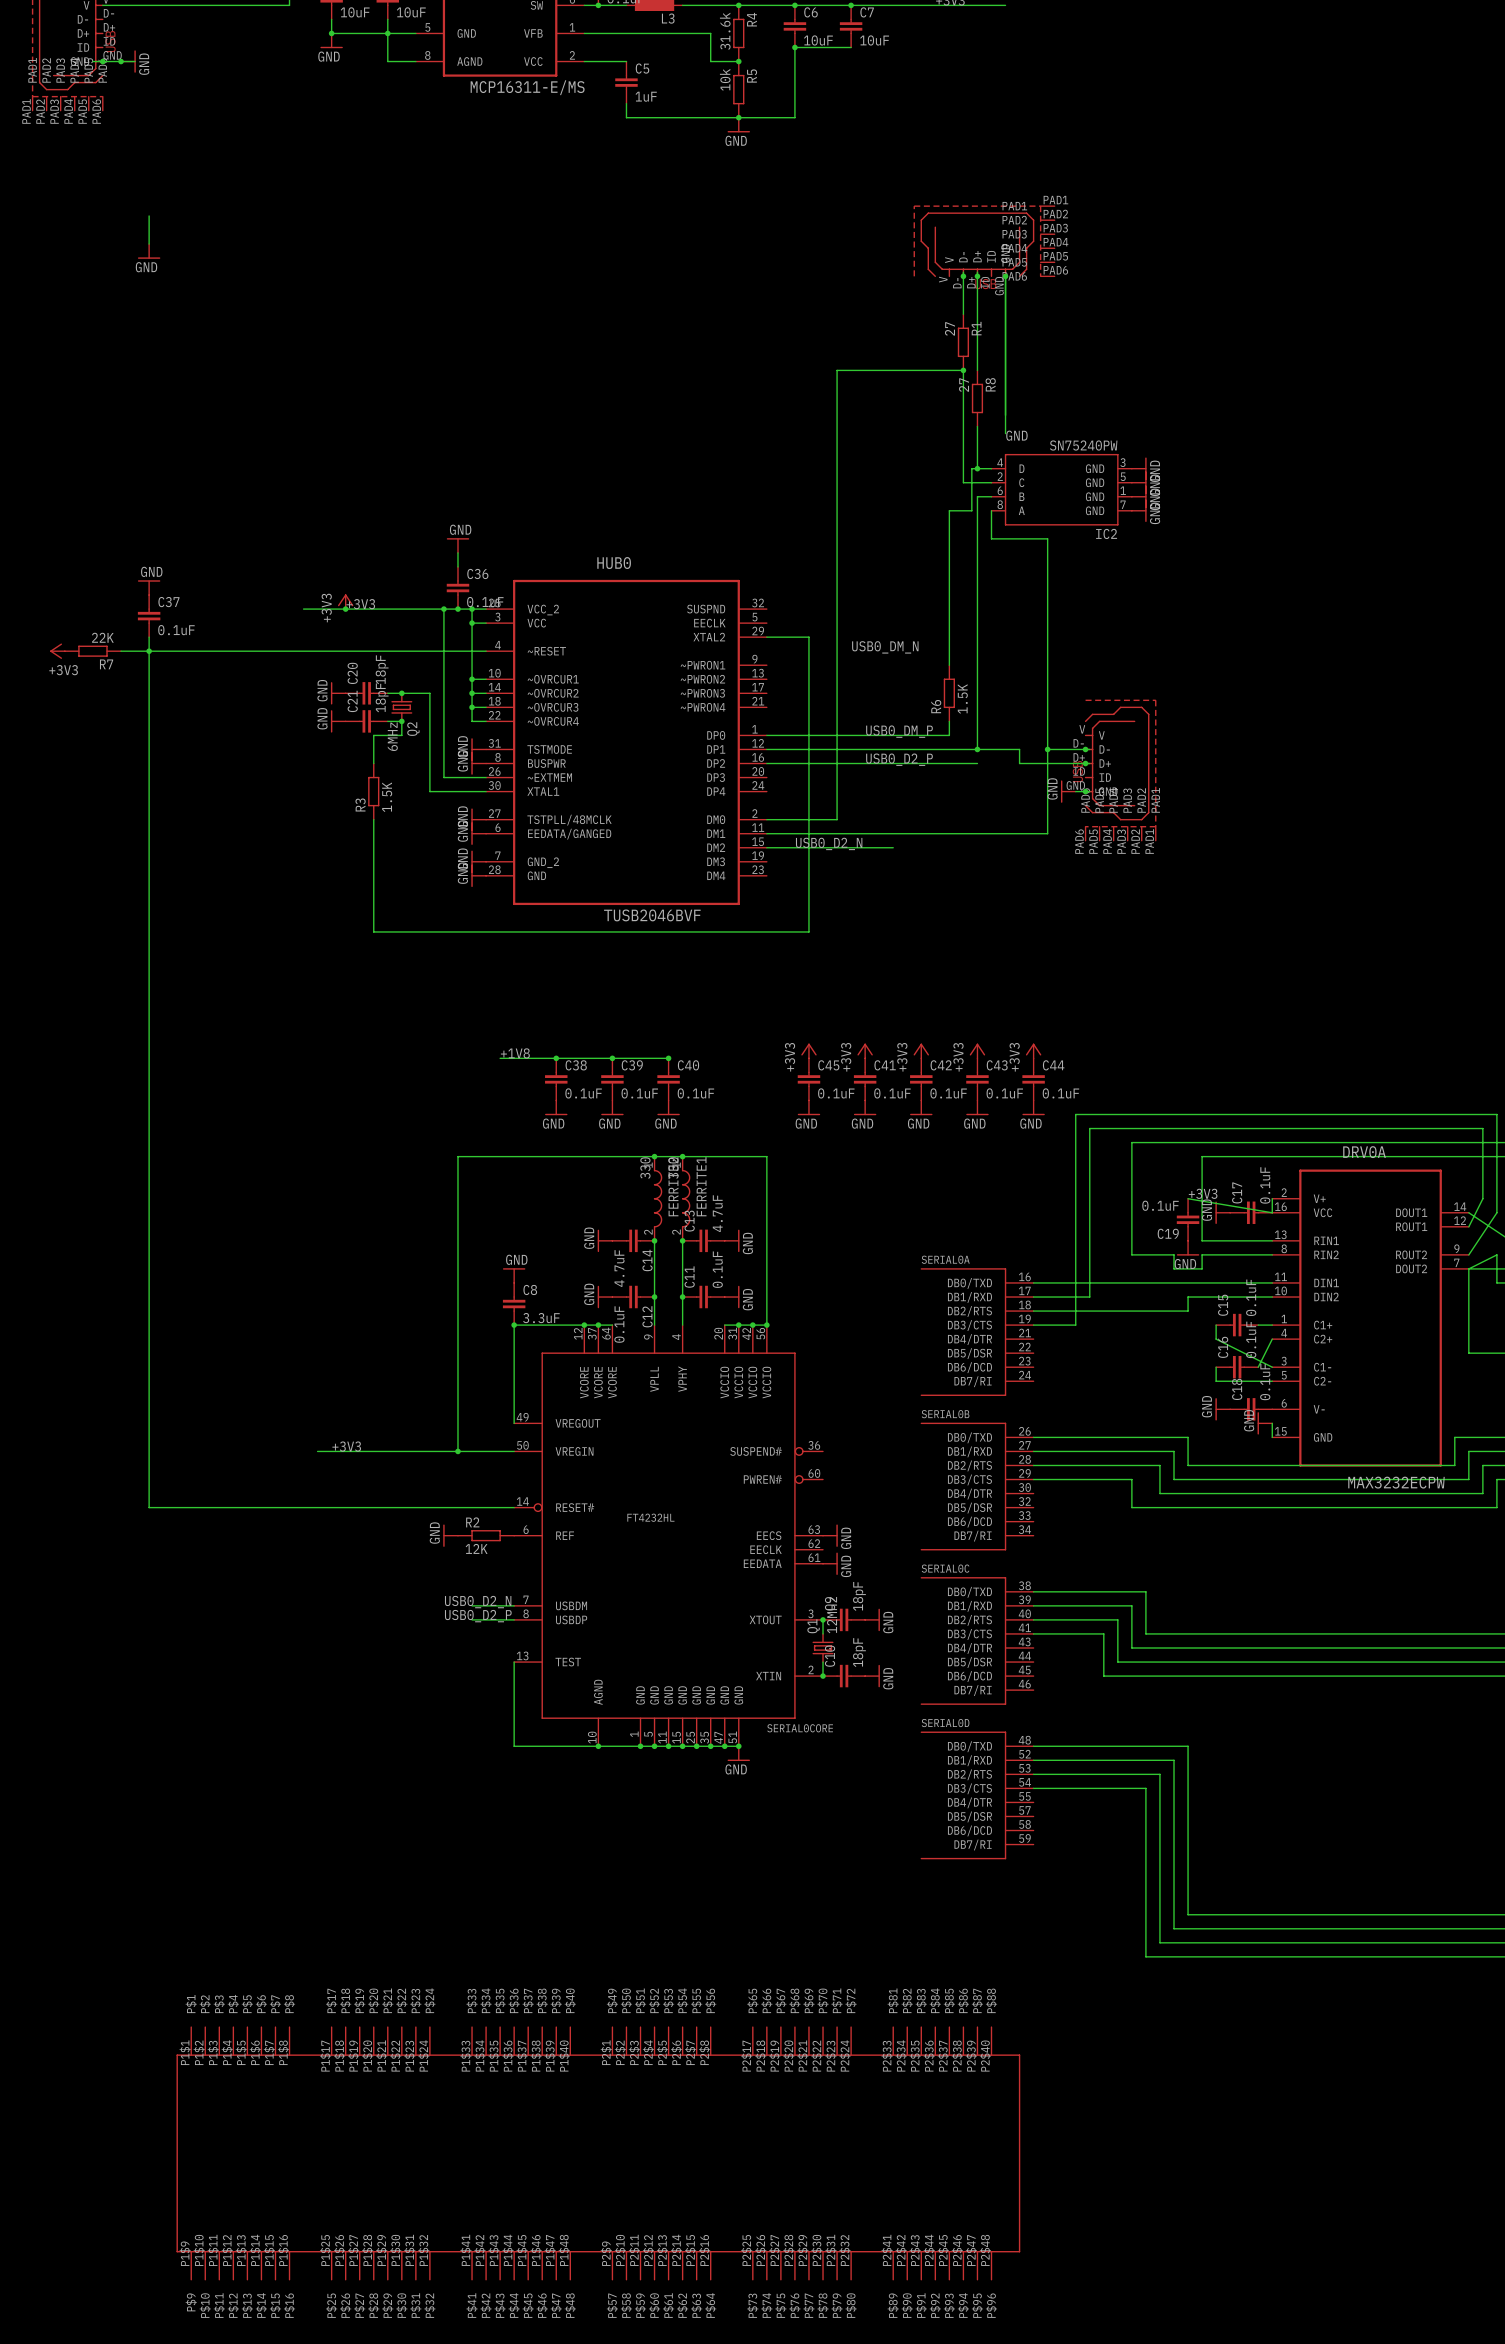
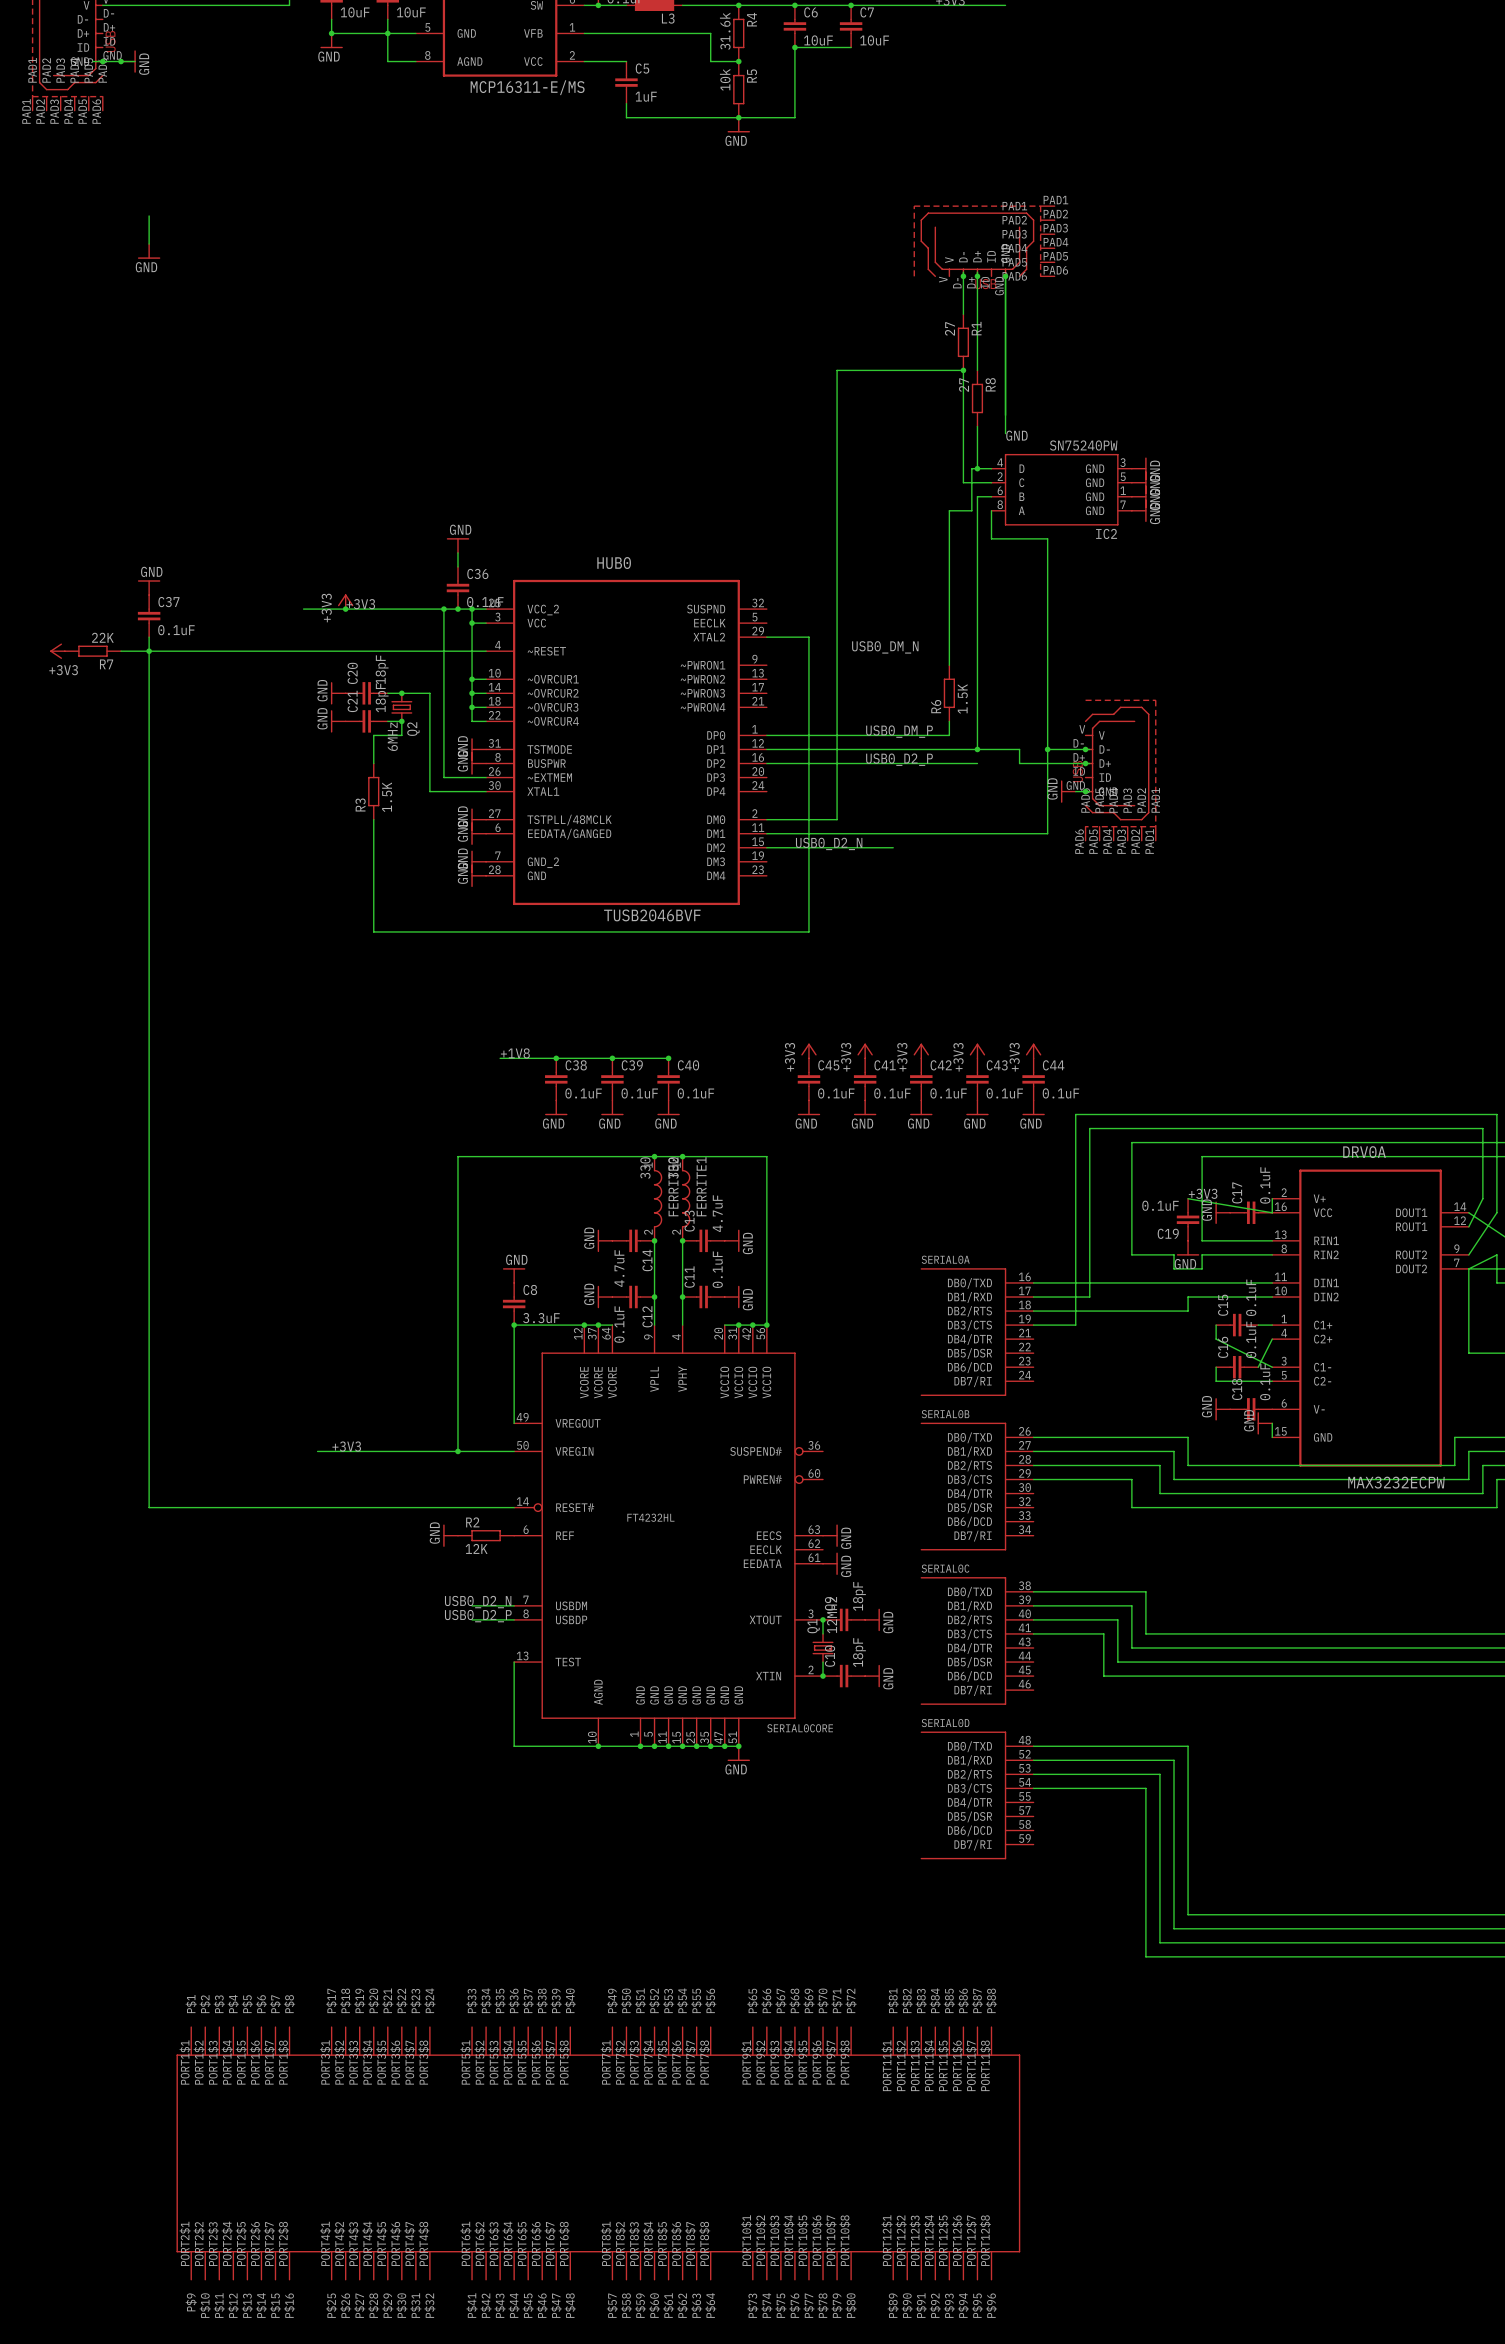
part symbol: [176, 2027, 1021, 2280] -> [176, 2027, 1021, 2280]

